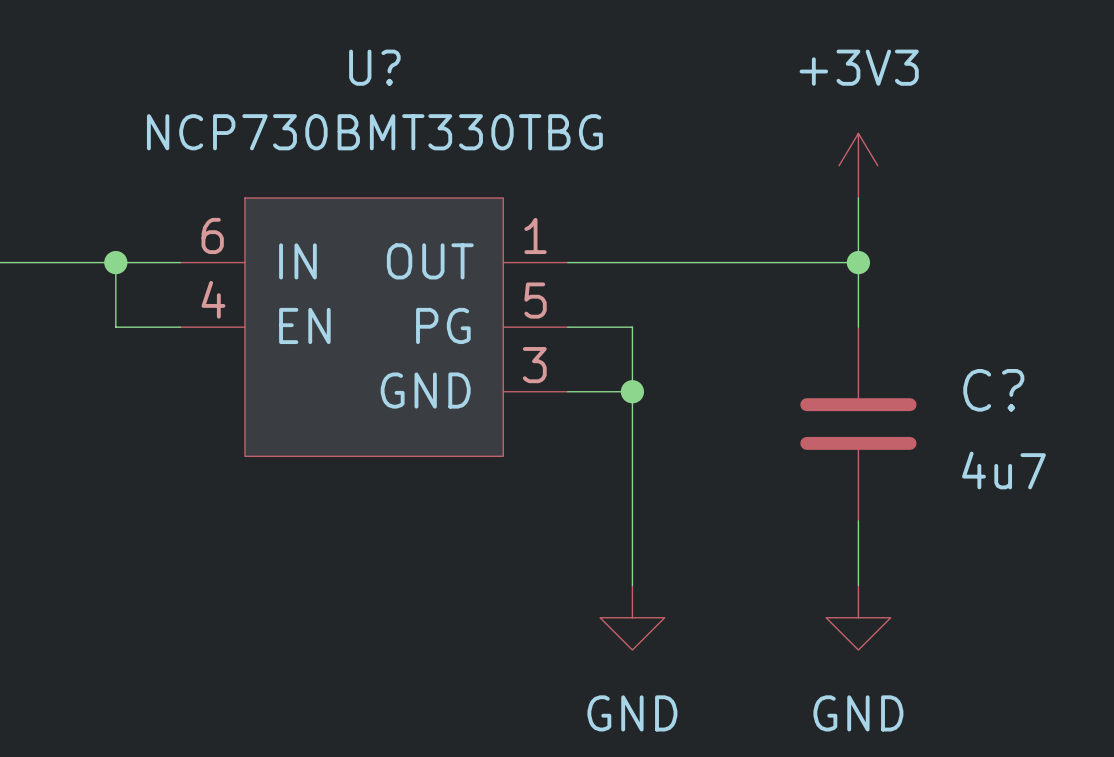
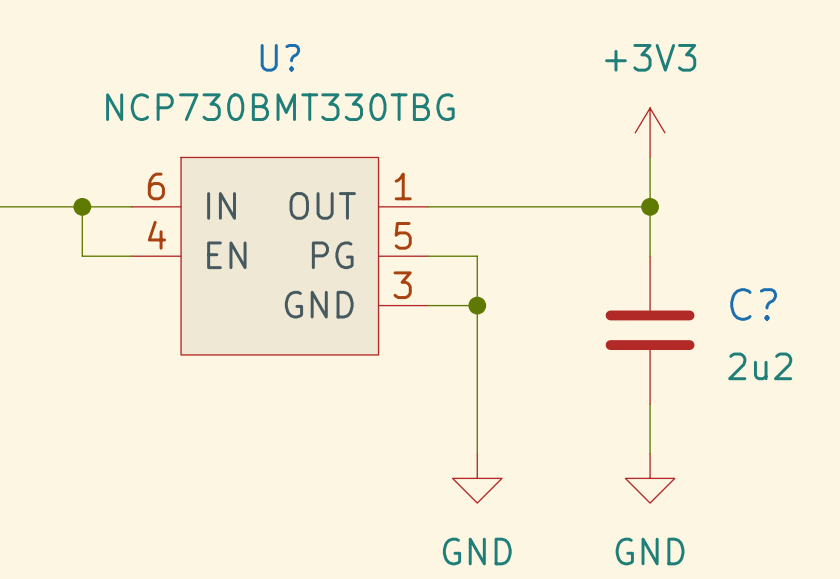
C? text: 4u7 (1003, 470) -> 2u2 (760, 366)

